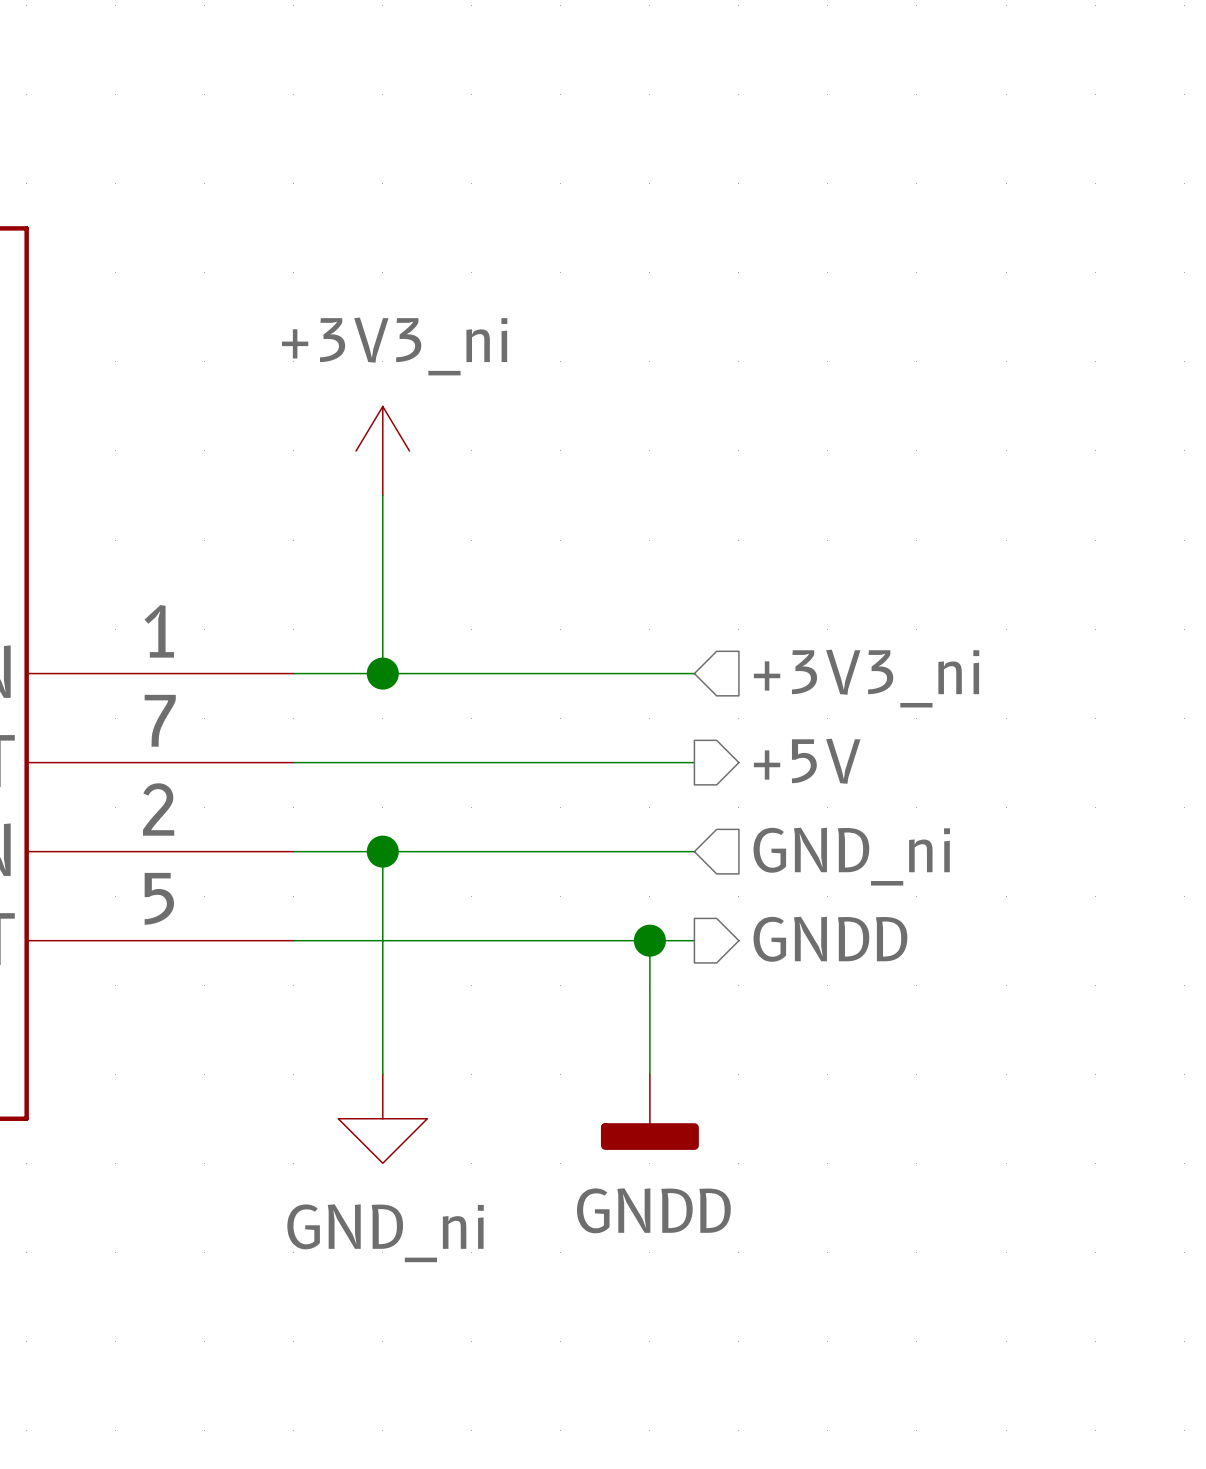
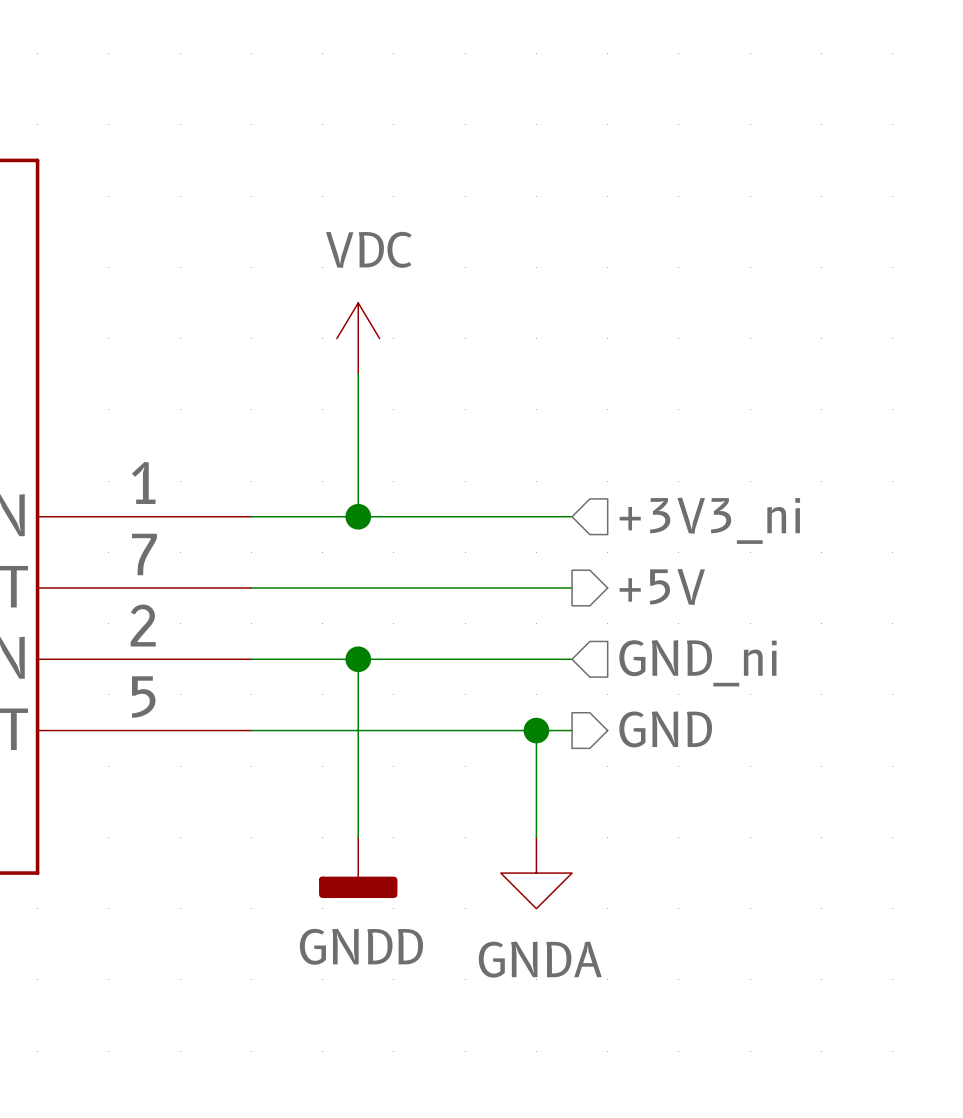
power symbol: +3V3_ni (382, 450) -> none
power symbol: none -> VDC (358, 338)
wire: (382, 495) (382, 673) -> (358, 374) (358, 516)
junction position: (382, 673) -> (358, 516)
wire: (382, 851) (382, 1074) -> (358, 659) (358, 837)
junction position: (382, 851) -> (358, 659)
hierarchical label: GNDD (830, 939) -> GND (665, 729)
power symbol: none -> GNDD (358, 867)
power symbol: GNDD (649, 1112) -> GNDA (536, 873)
power symbol: GND_ni (382, 1118) -> none

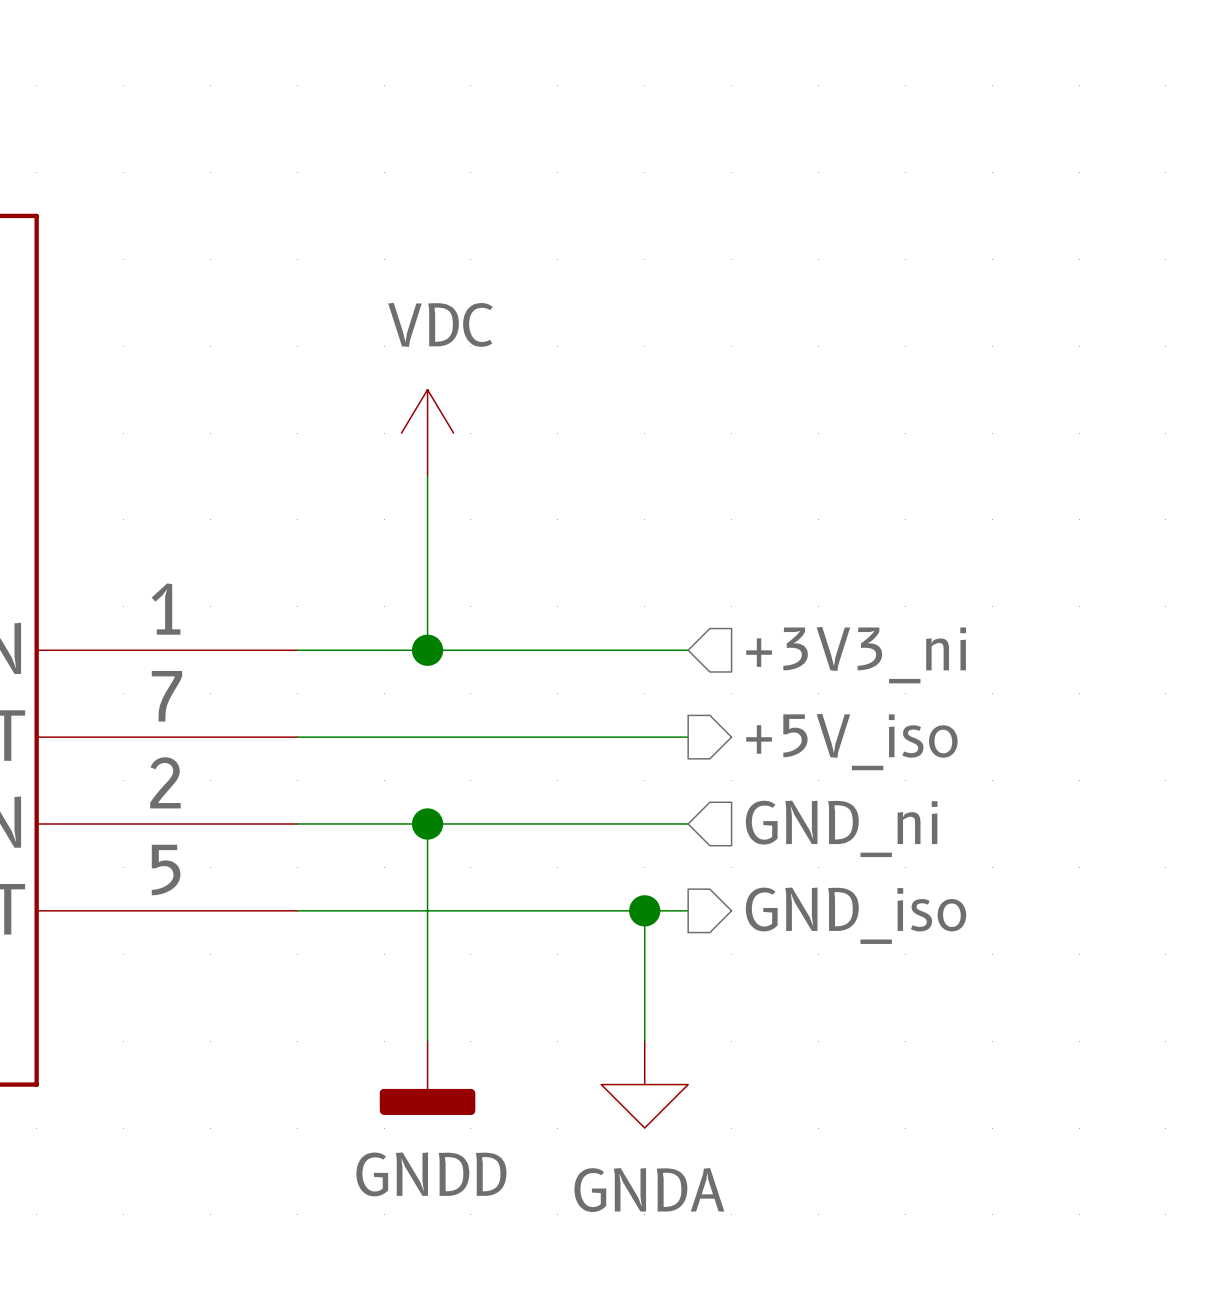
hierarchical label: +5V (662, 586) -> +5V_iso (851, 742)
hierarchical label: GND (665, 729) -> GND_iso (856, 915)

